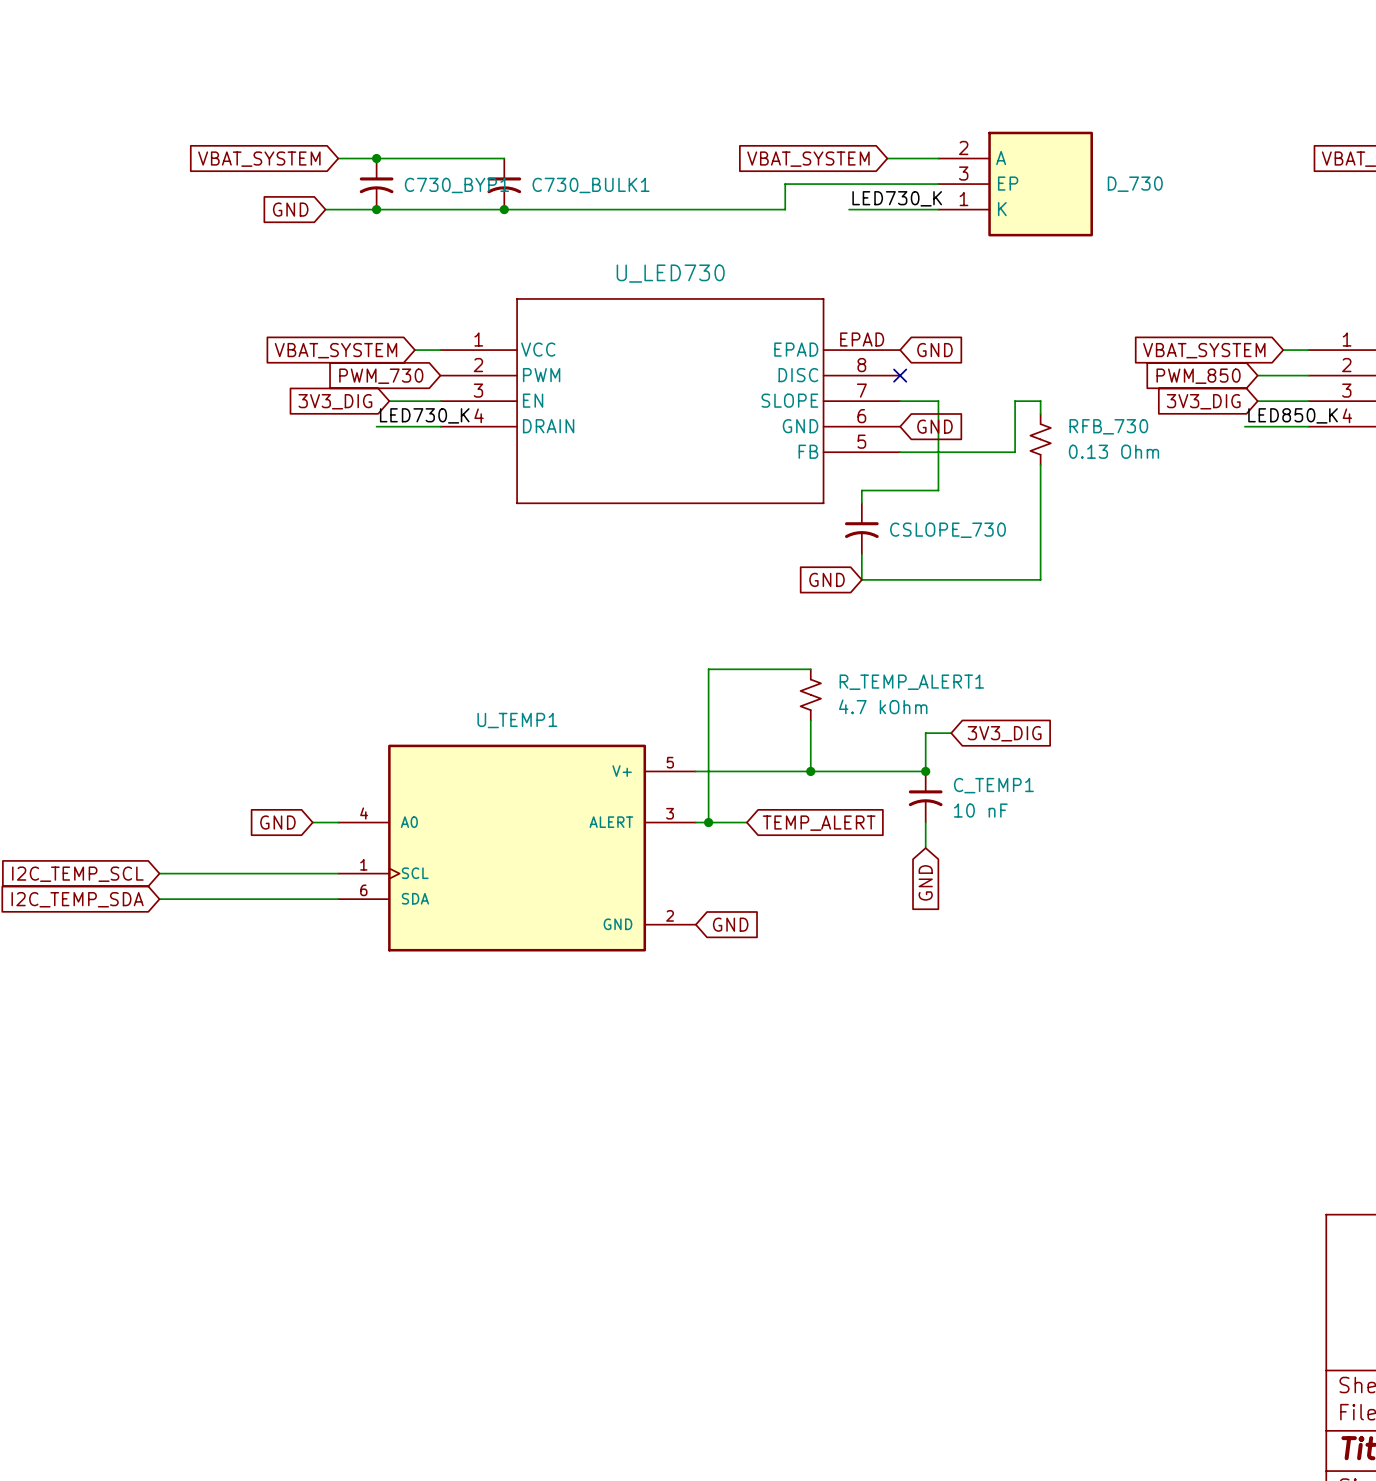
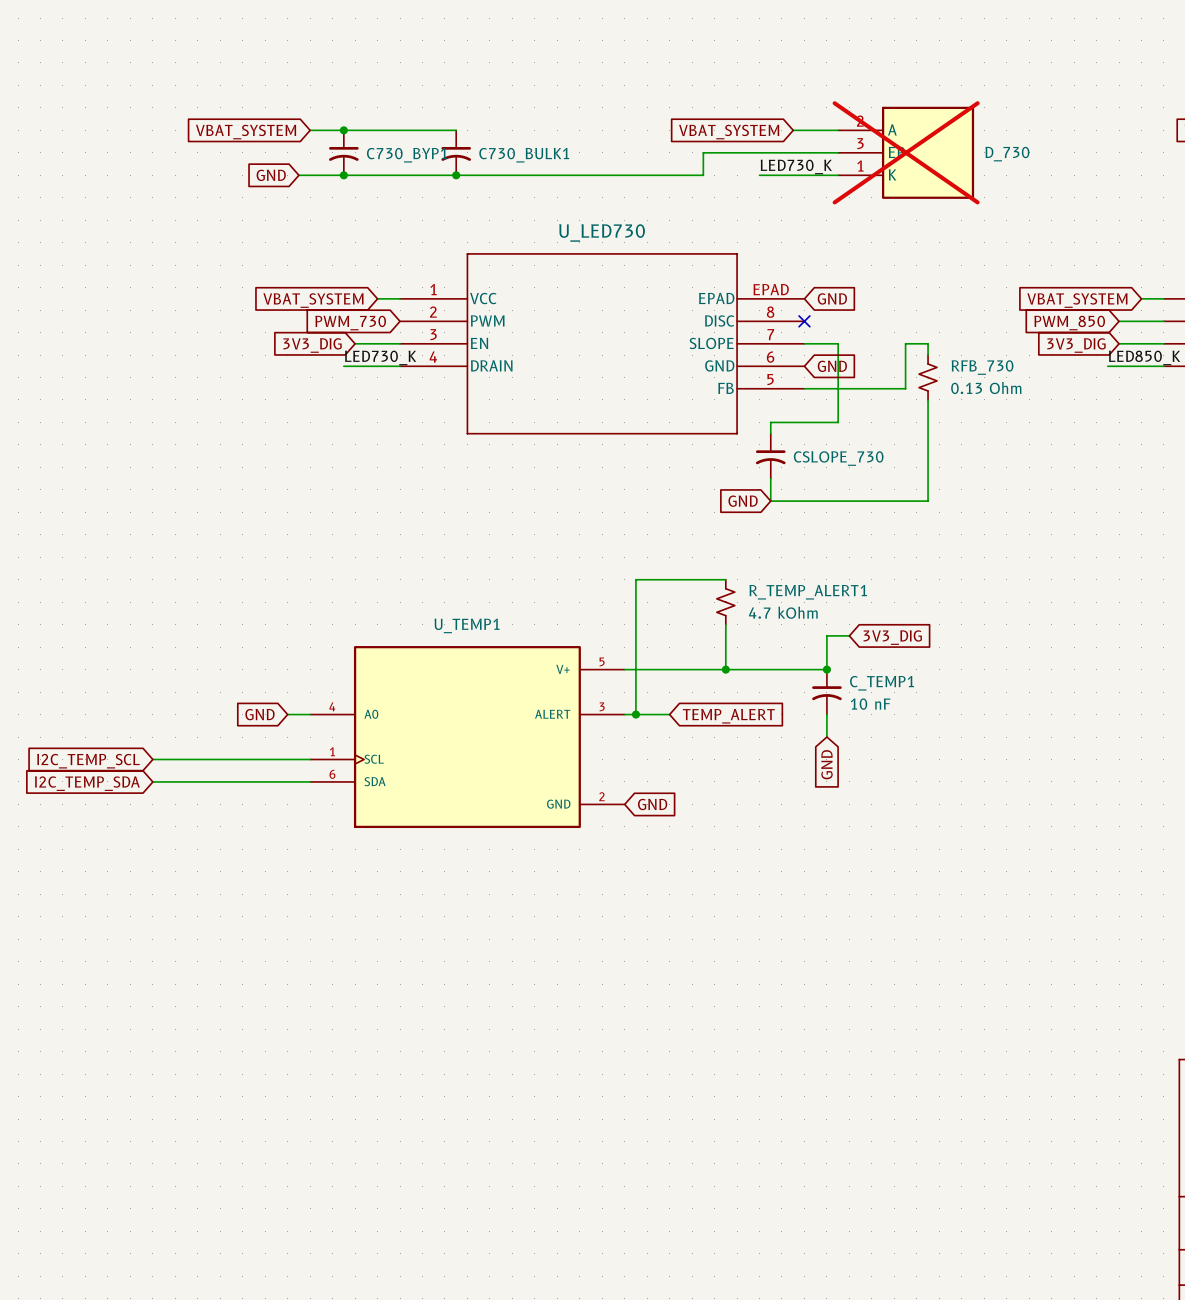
D_730 do-not-place cross: none -> (906, 152)

